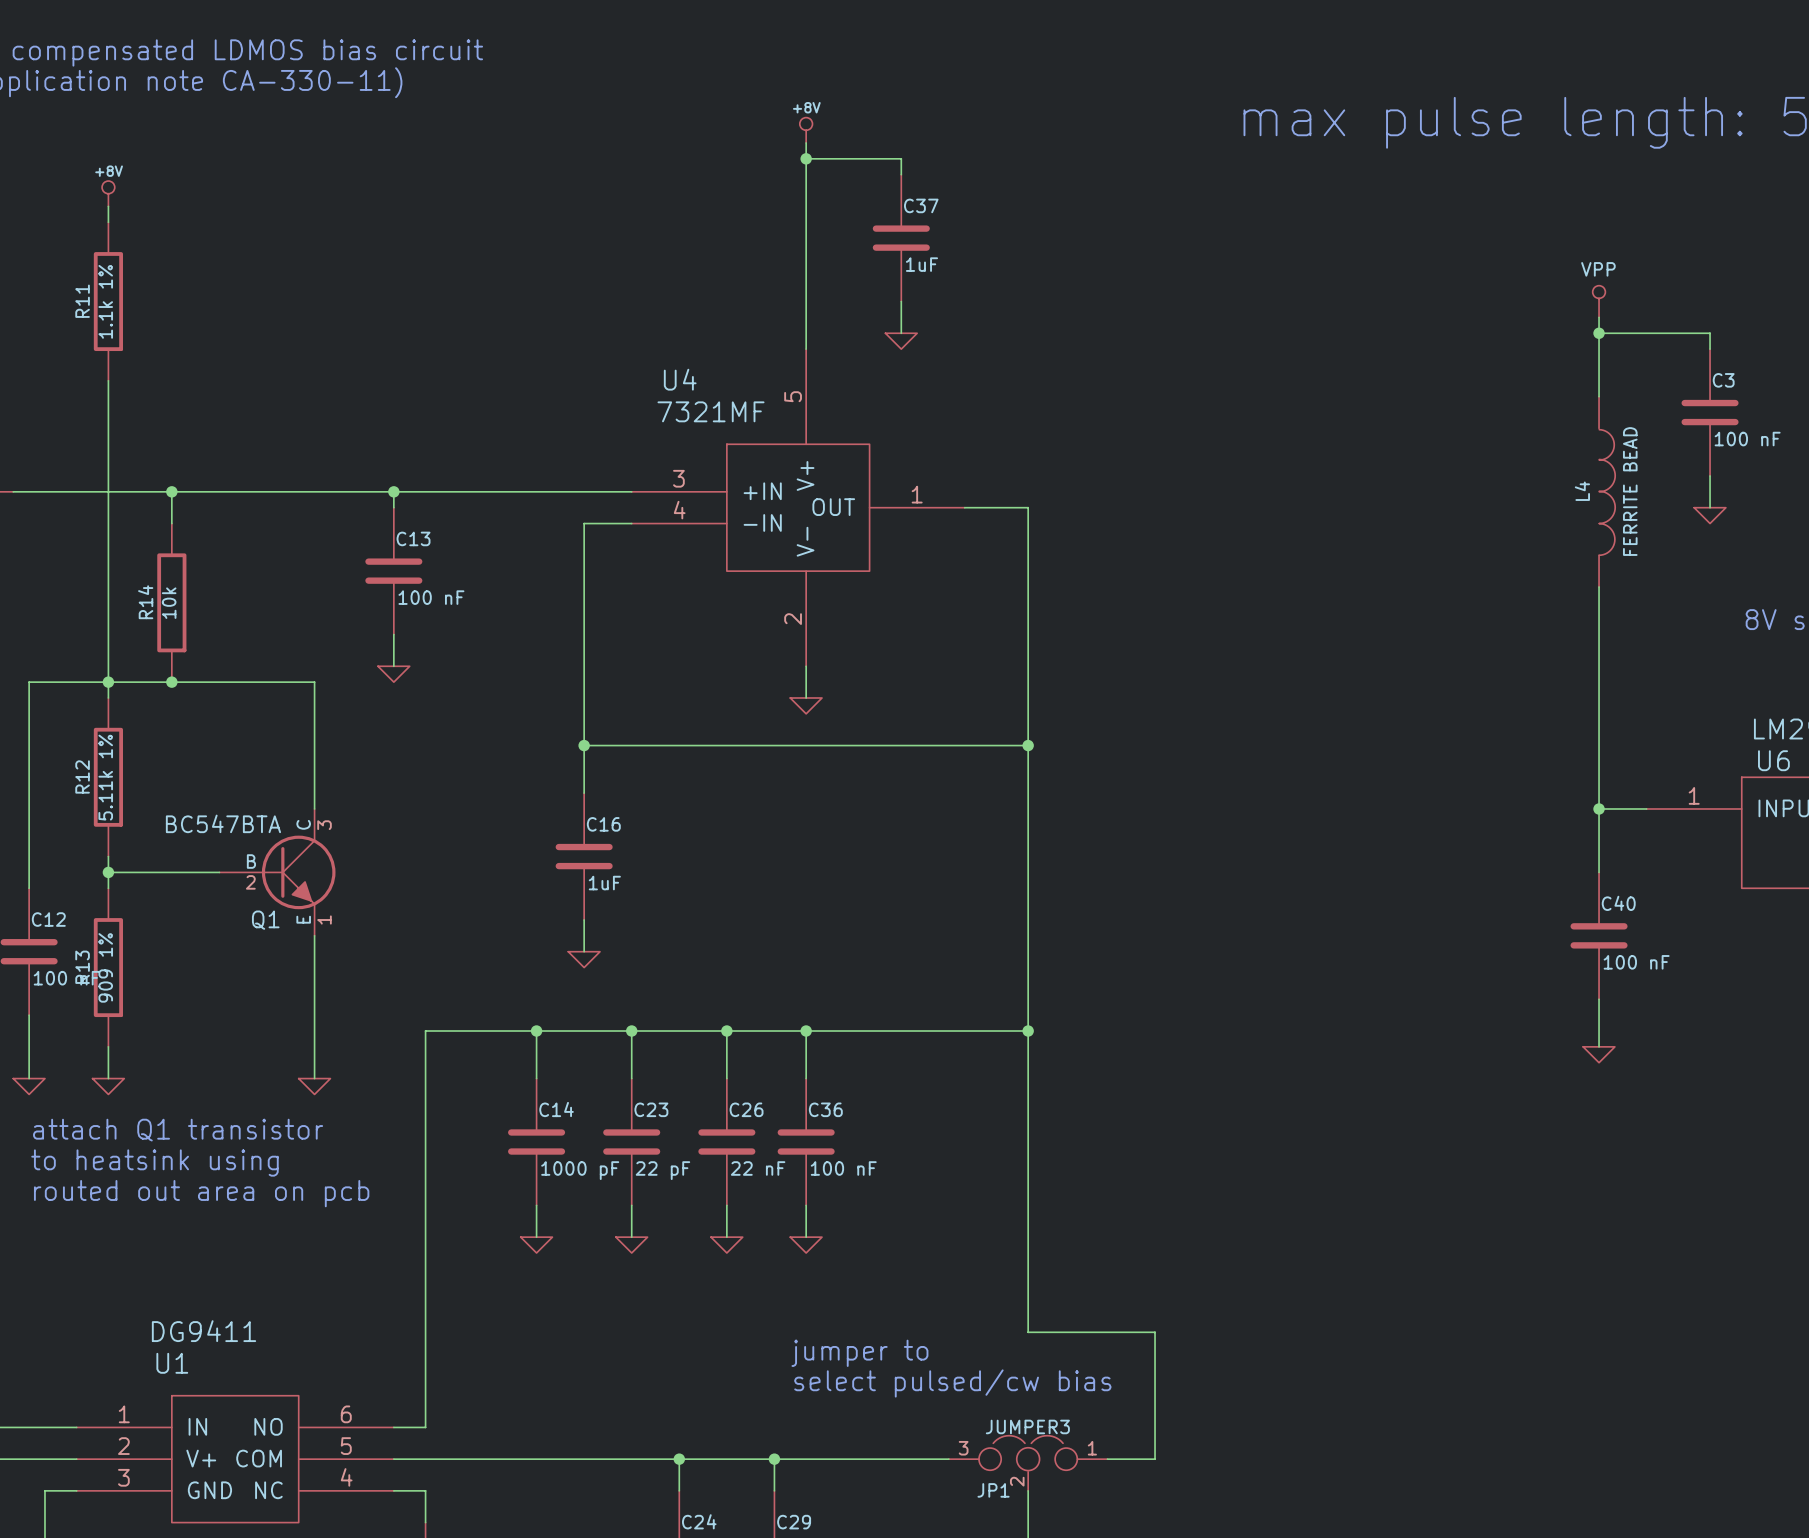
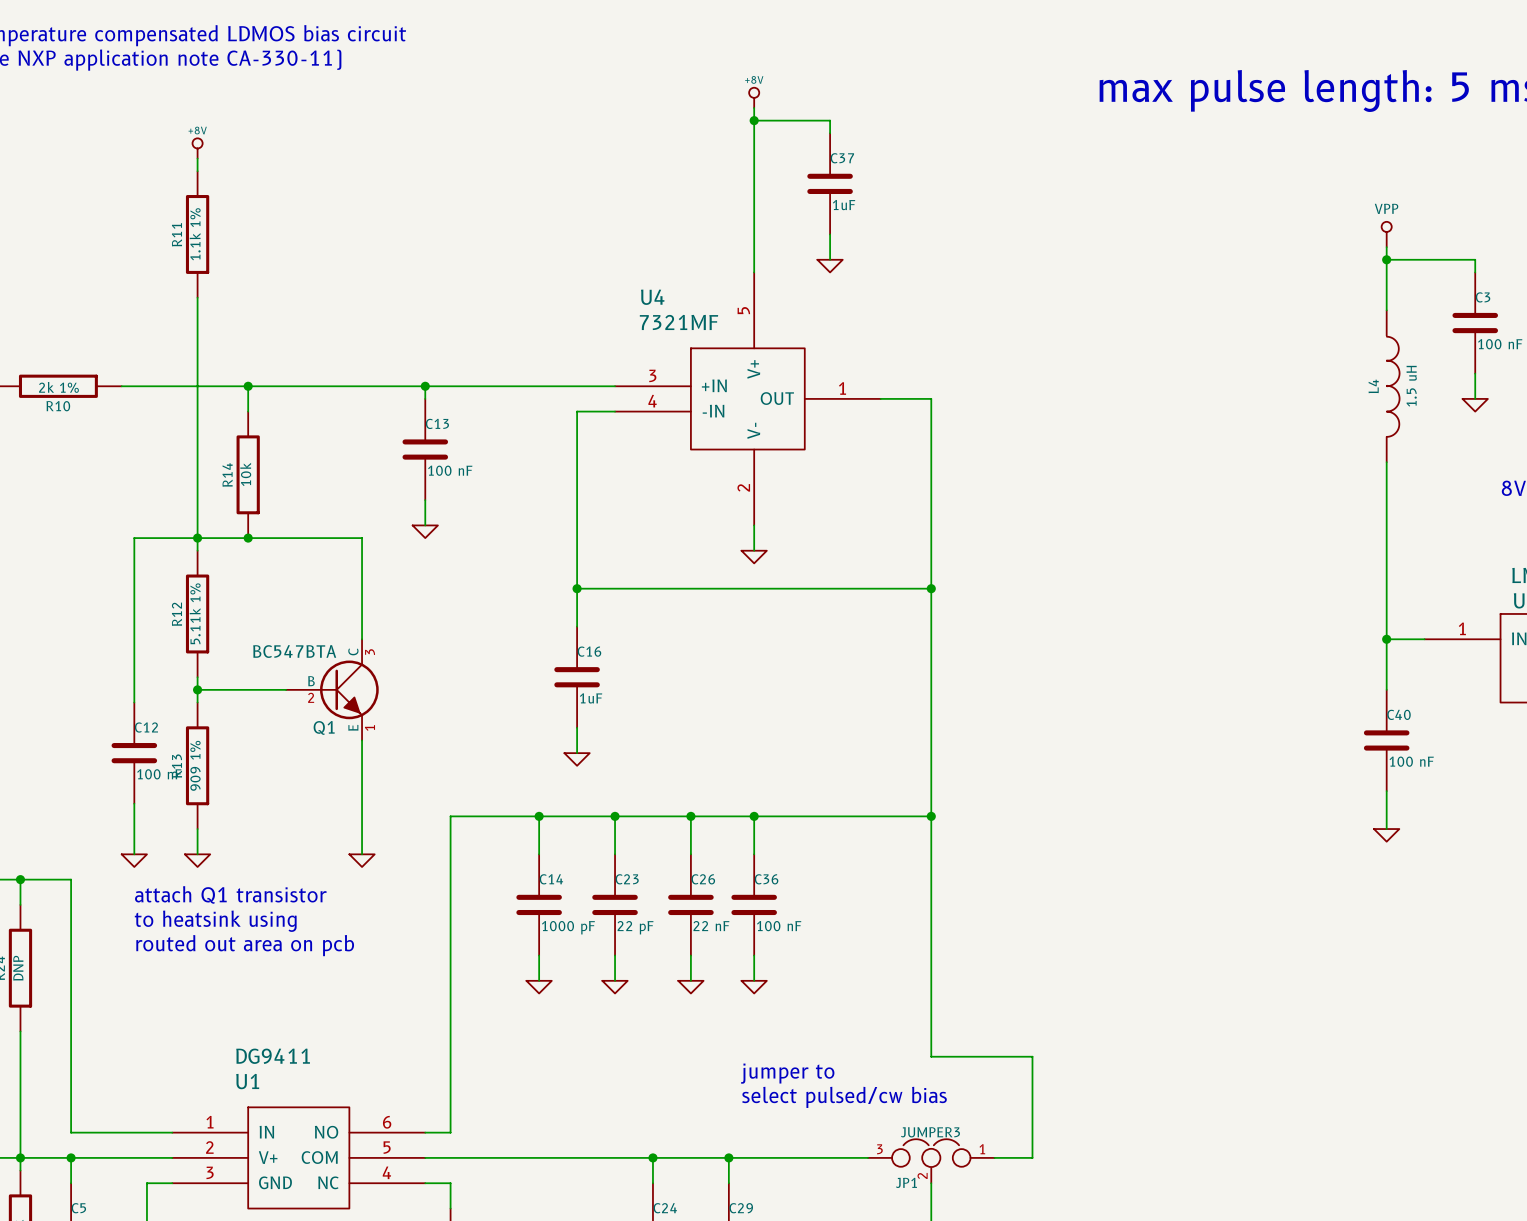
L4 value: FERRITE BEAD (1630, 491) -> 1.5 uH (1411, 386)

